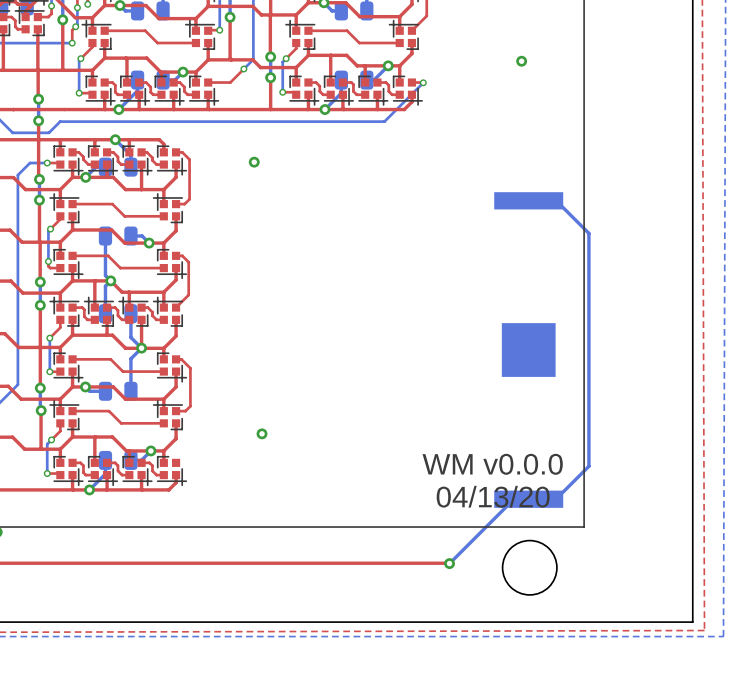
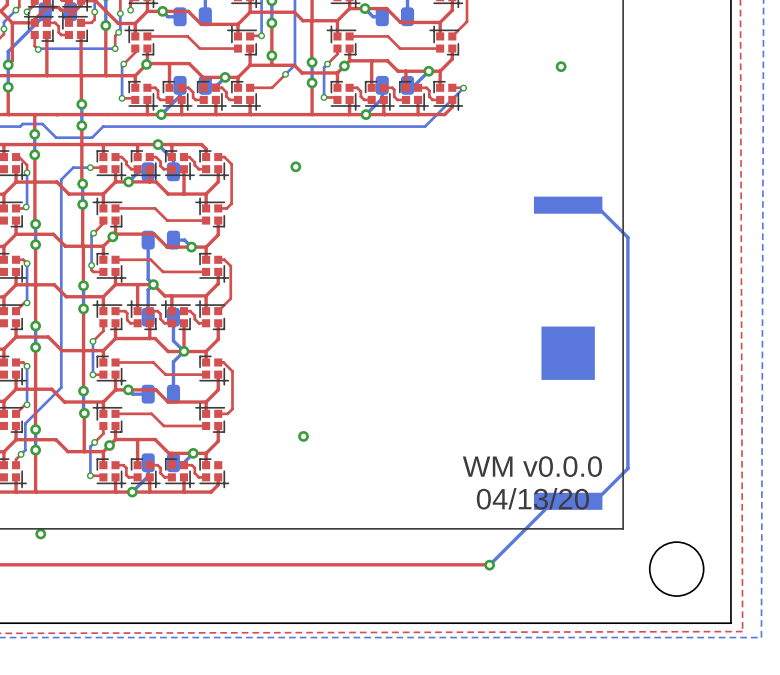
via: none -> (271, 55)
via: none -> (146, 64)
via: none -> (344, 65)
via: none -> (112, 236)
via: none -> (109, 445)
round board edge position: (529, 567) -> (676, 569)

